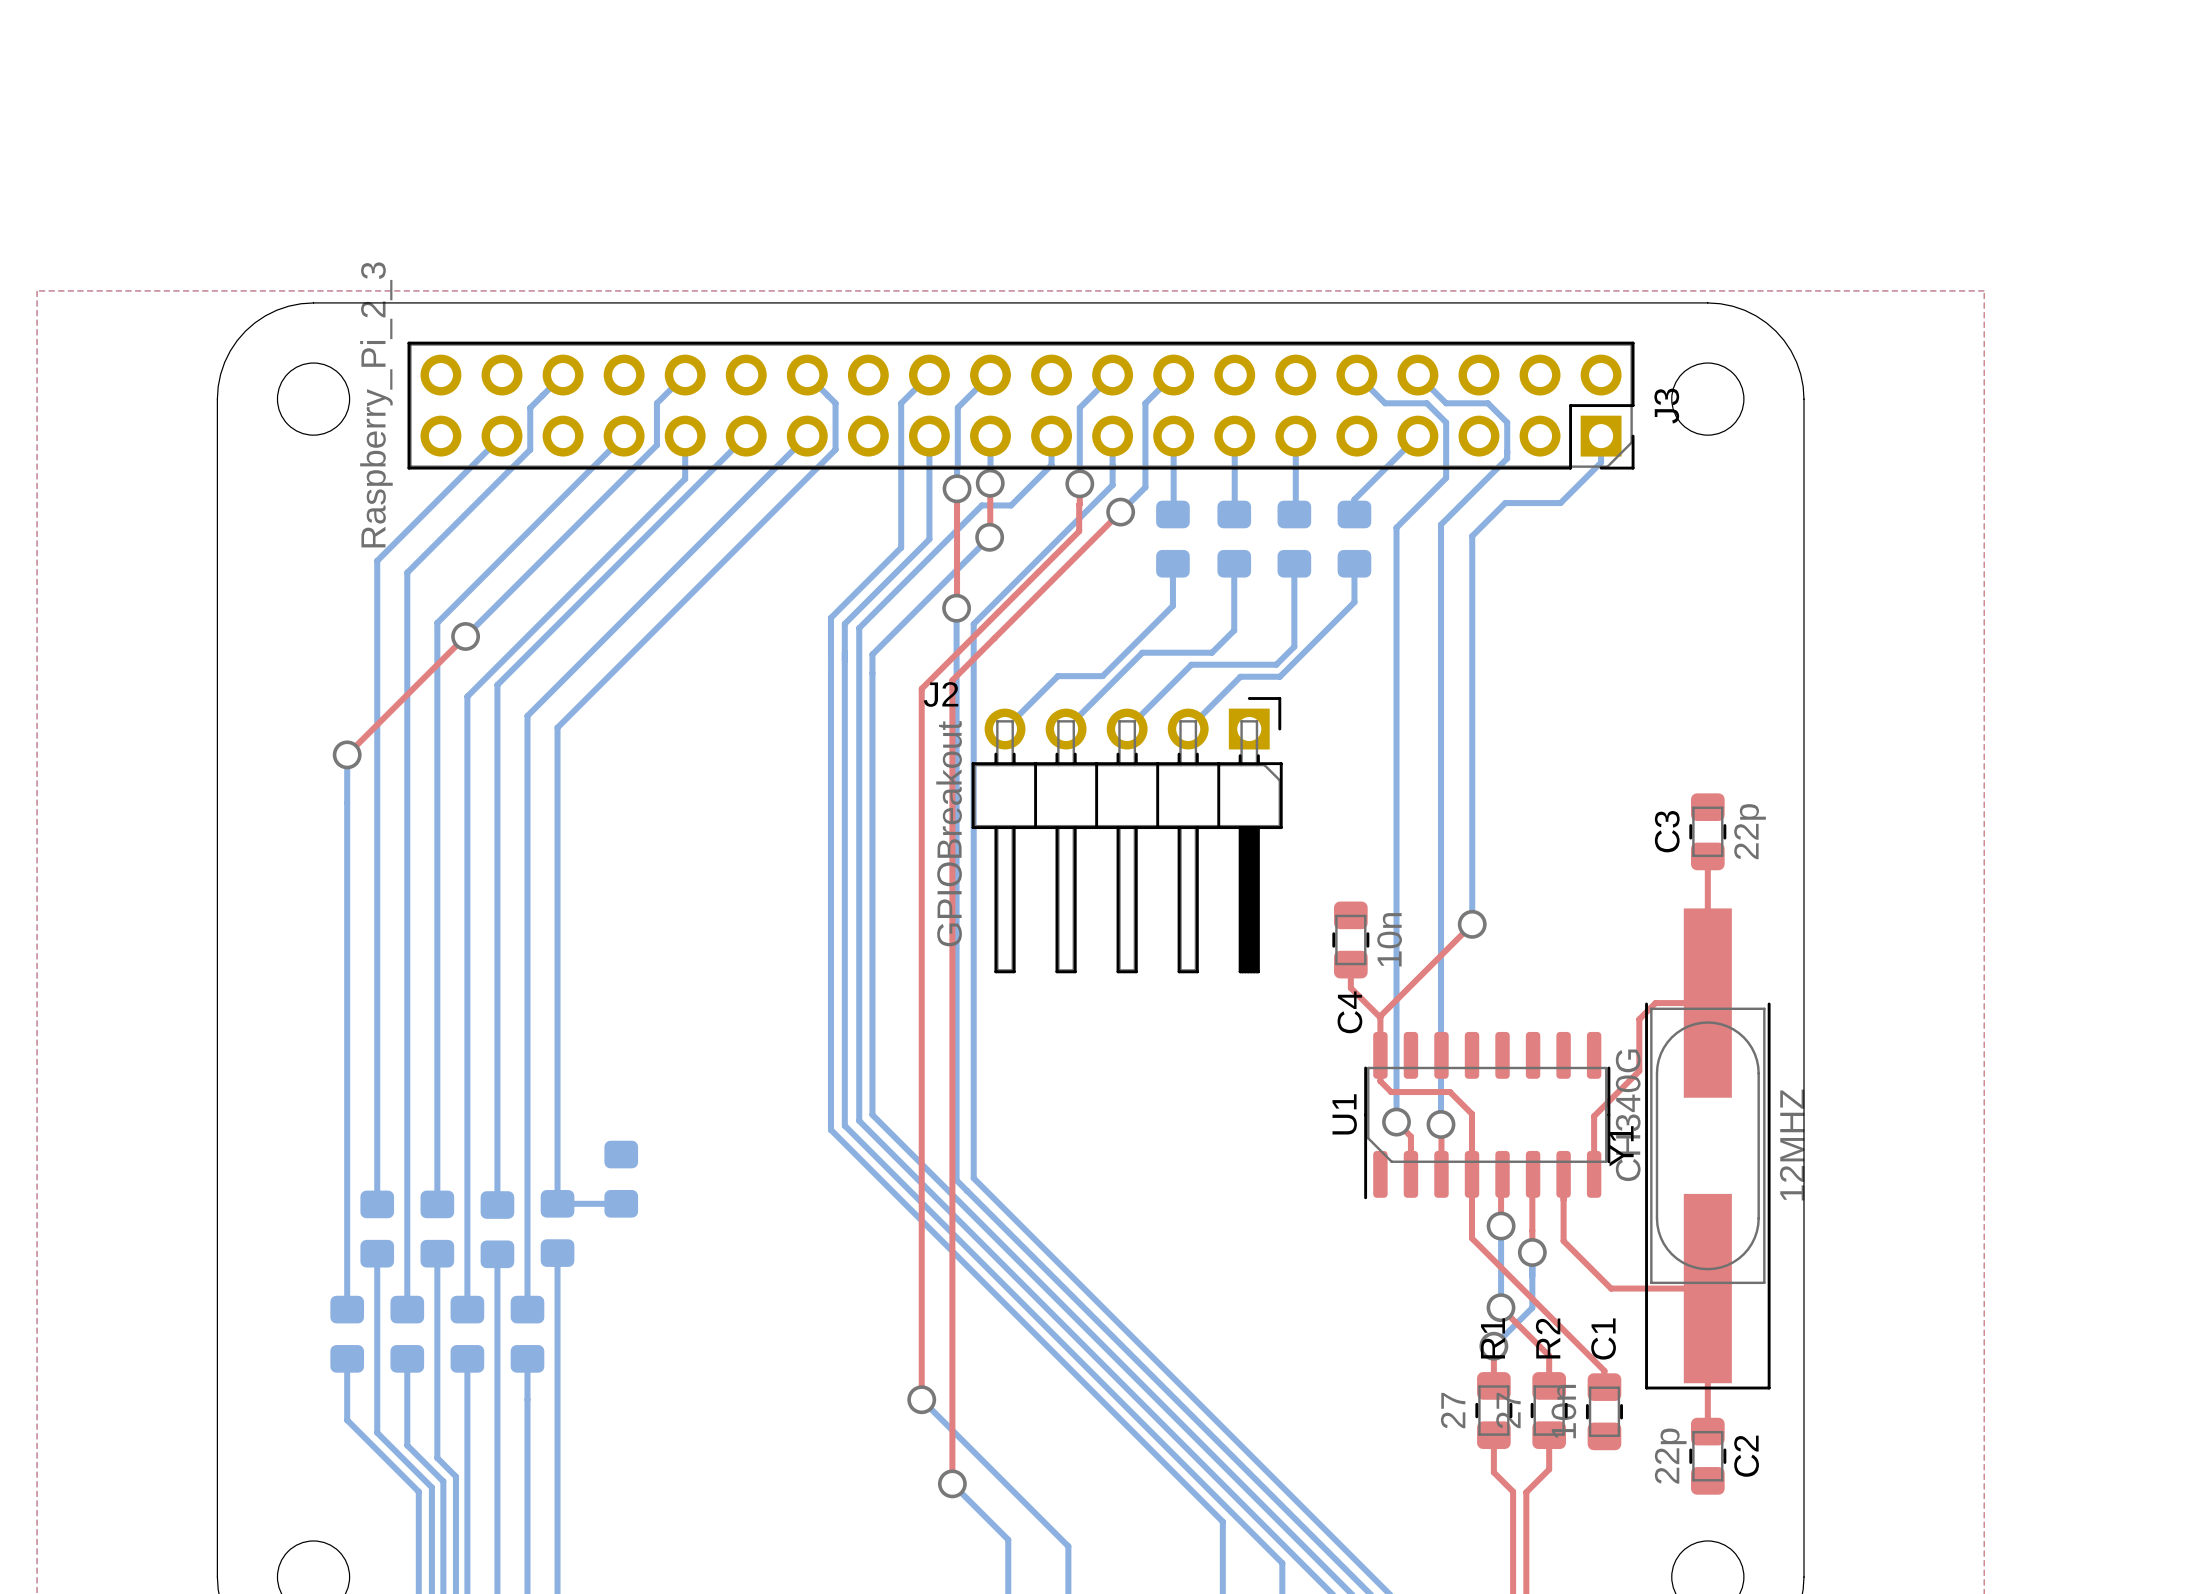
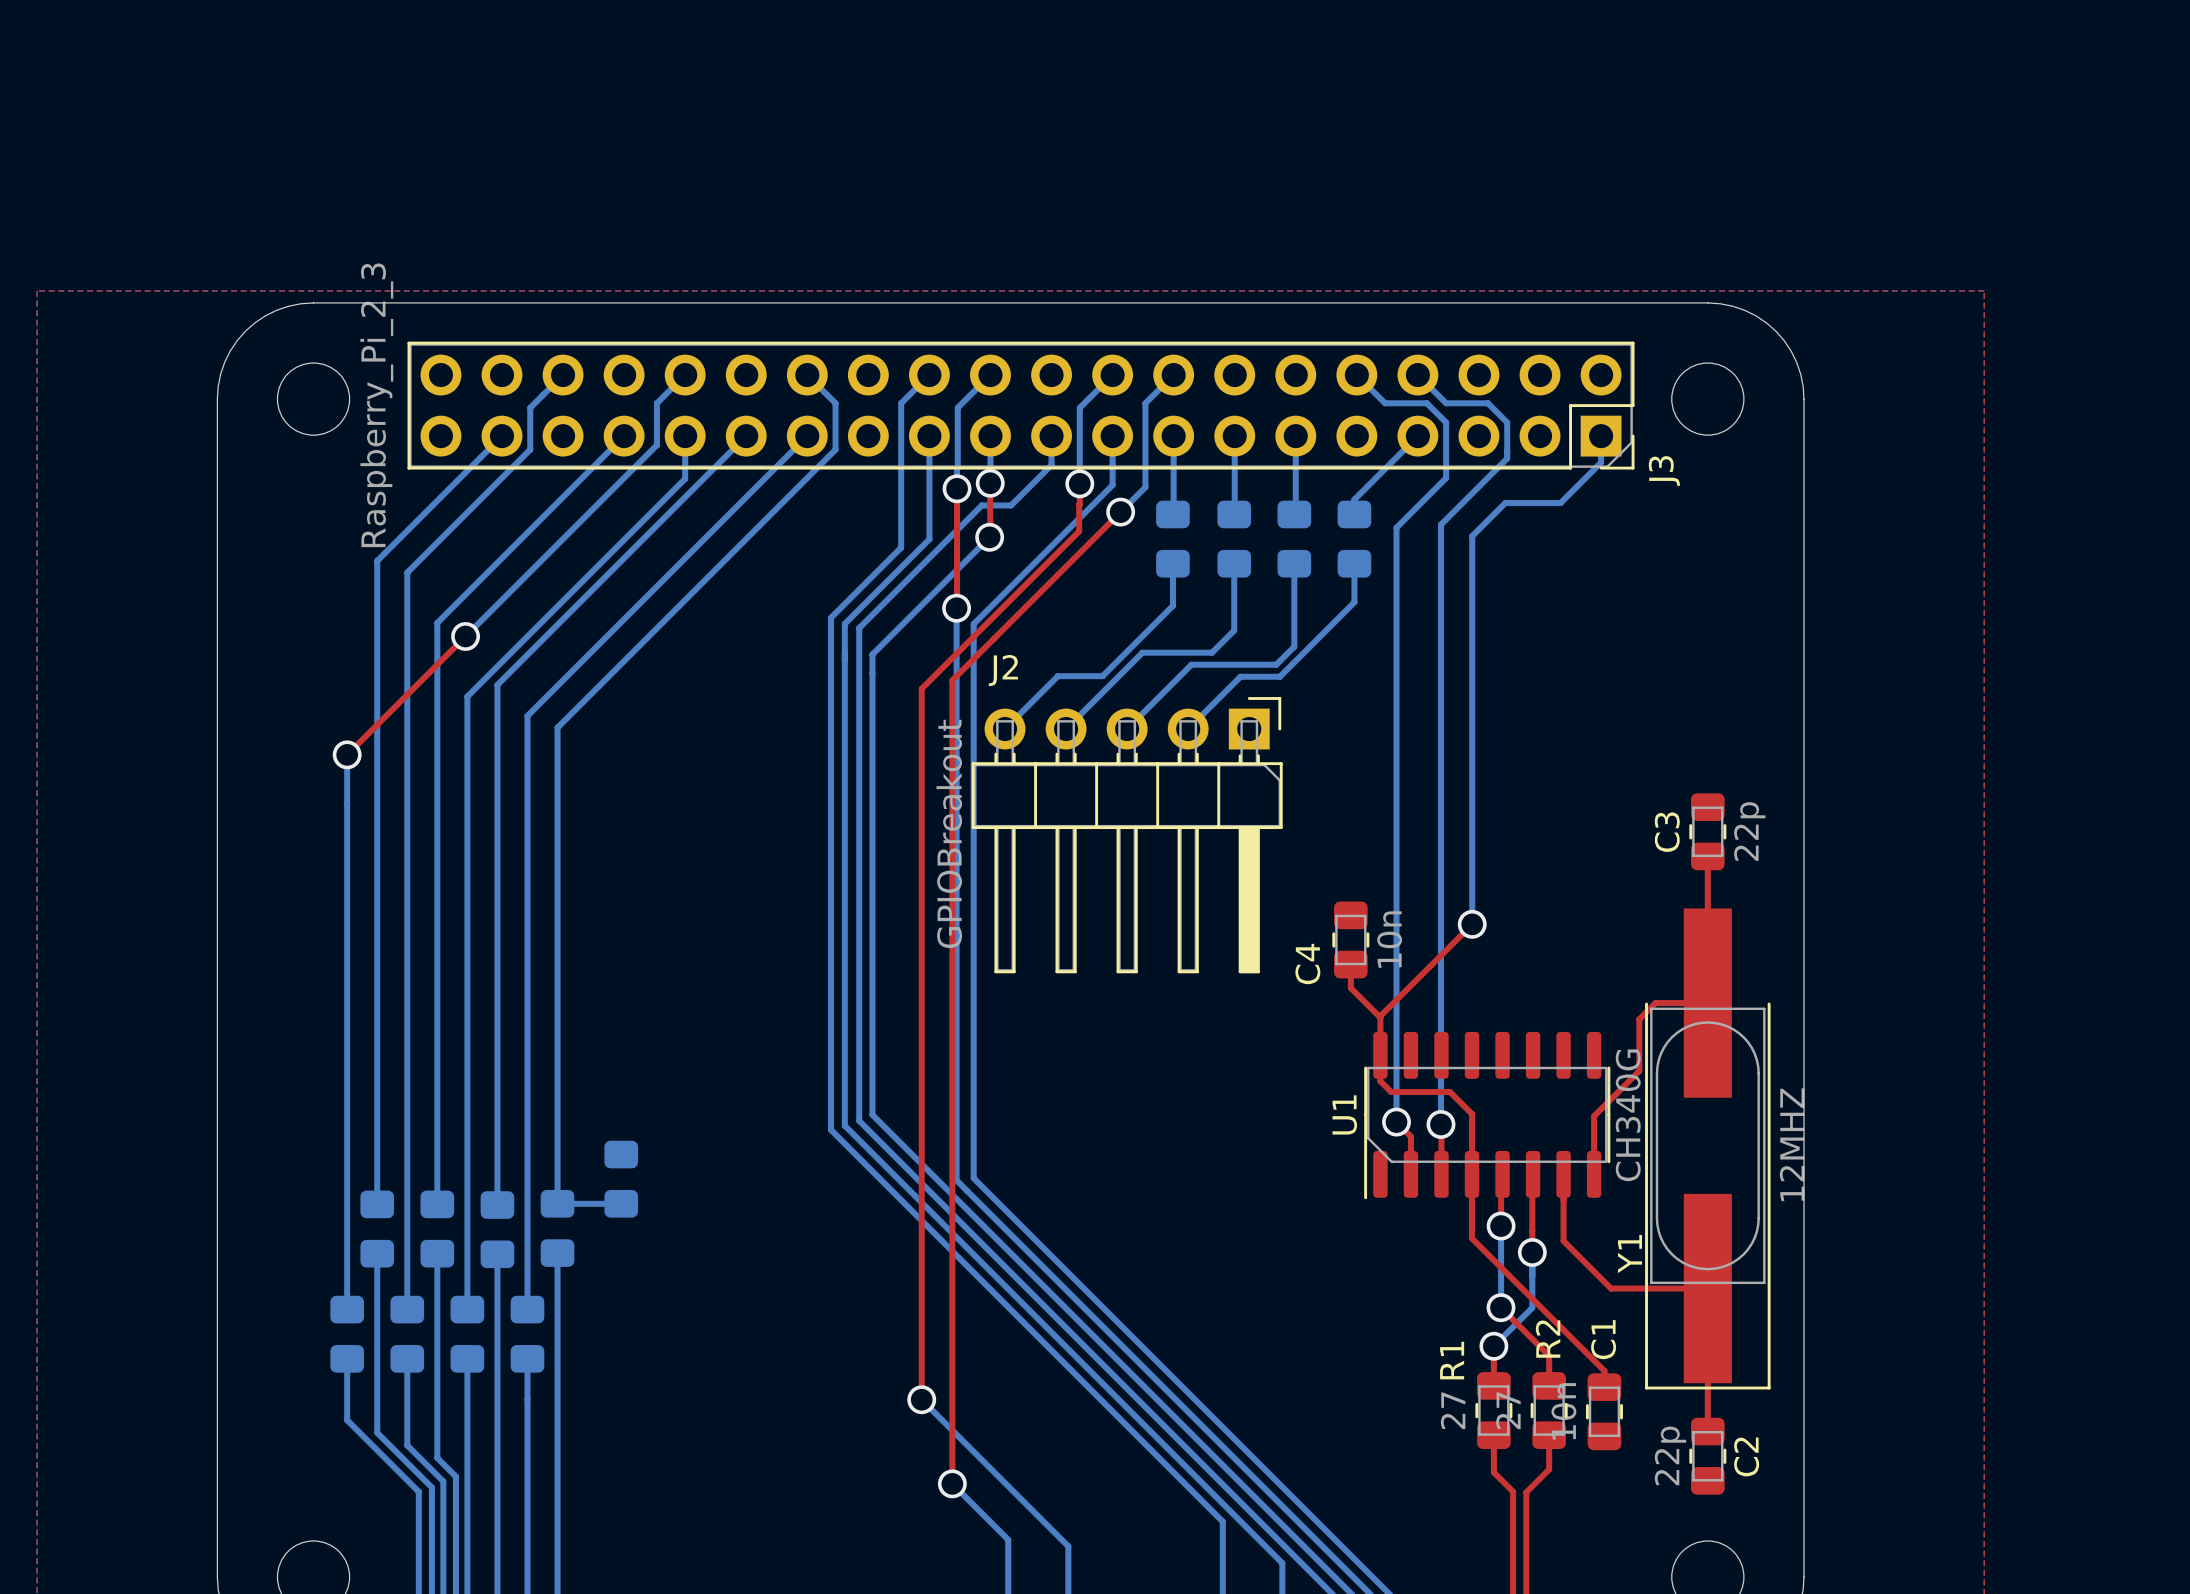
J3 name position: J3 (1666, 406) -> J3 (1664, 470)
J2 name position: J2 (940, 694) -> J2 (1003, 670)
C4 name position: C4 (1349, 1012) -> C4 (1307, 964)
Y1 name position: Y1 (1621, 1146) -> Y1 (1630, 1254)
R1 name position: R1 (1492, 1338) -> R1 (1452, 1360)

